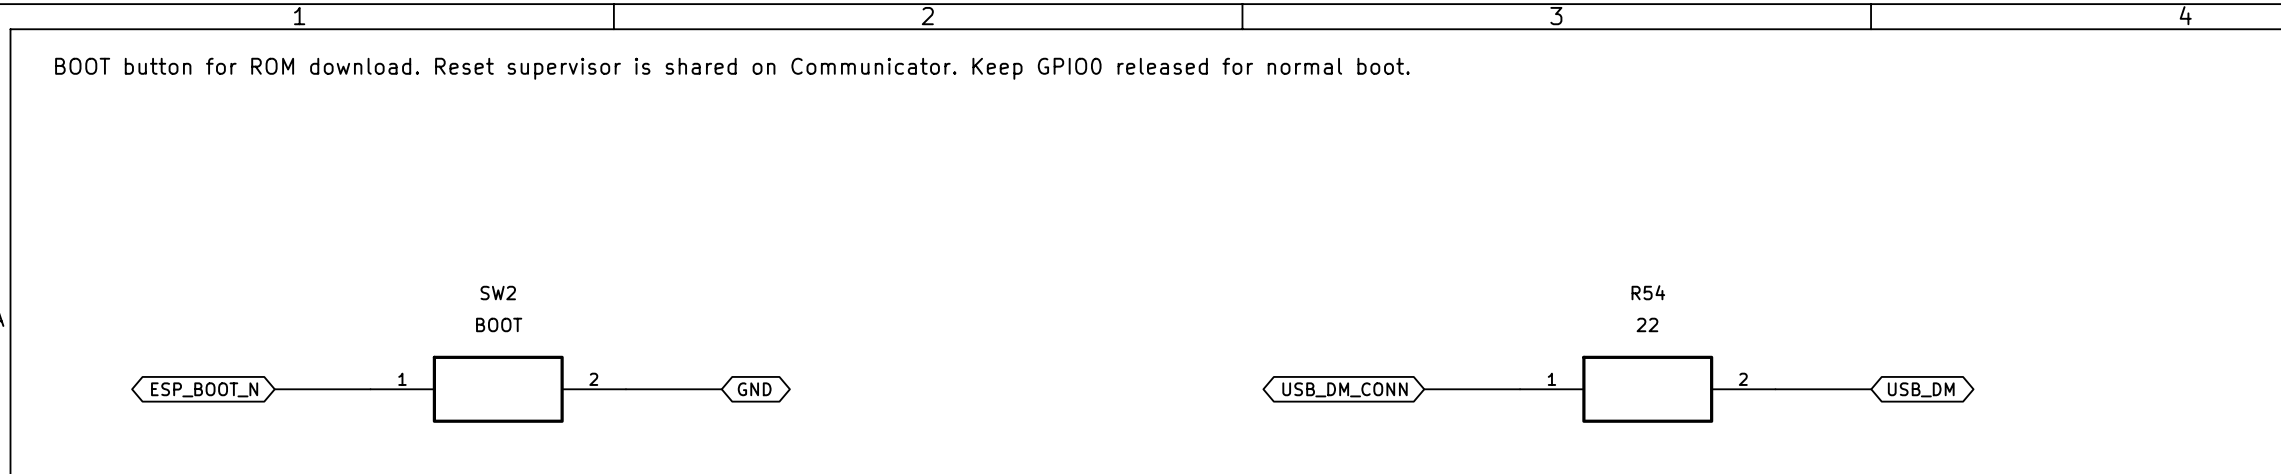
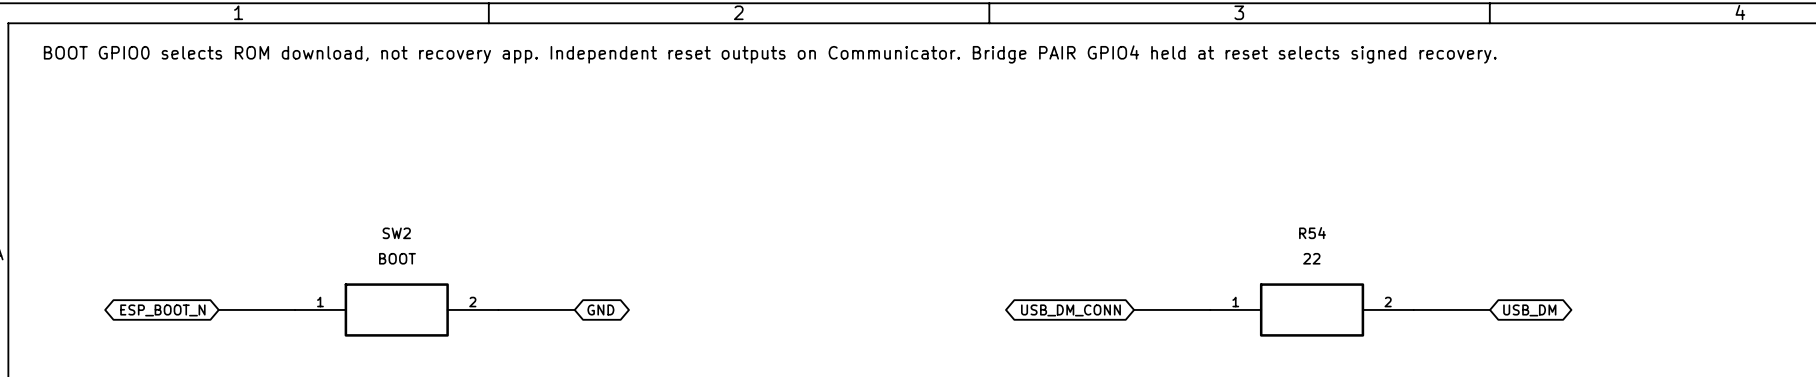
text: BOOT button for ROM download. Reset supervisor is shared on Communicator. Keep GPIO0 released for normal boot. (732, 68) -> BOOT GPIO0 selects ROM download, not recovery app. Independent reset outputs on Communicator. Bridge PAIR GPIO4 held at reset selects signed recovery. (770, 54)

